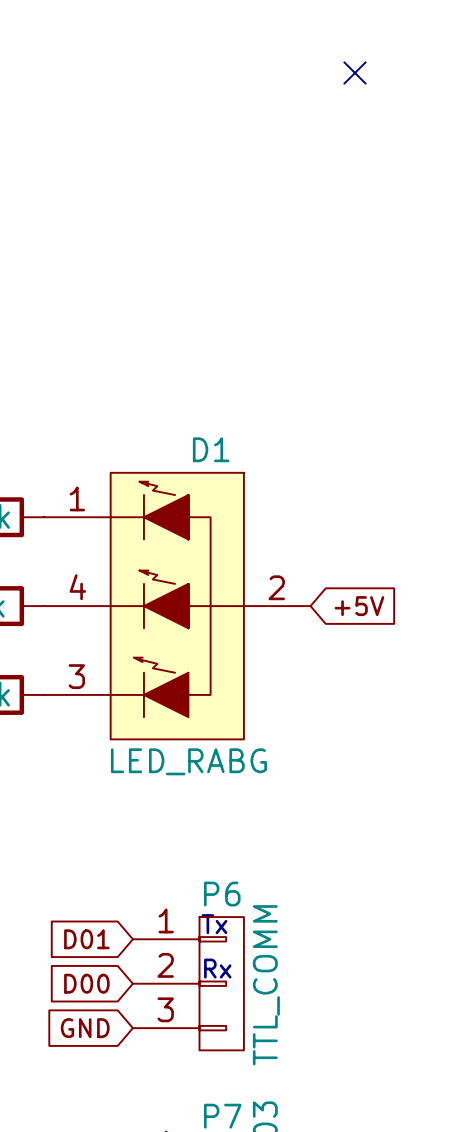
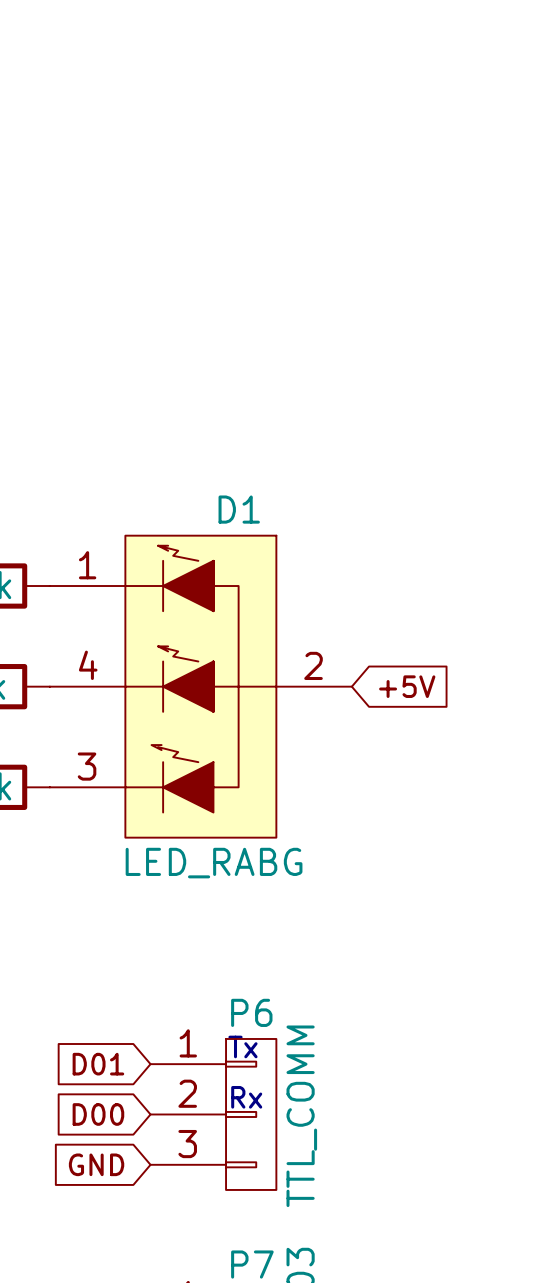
no-connect mark: (355, 72) -> none

